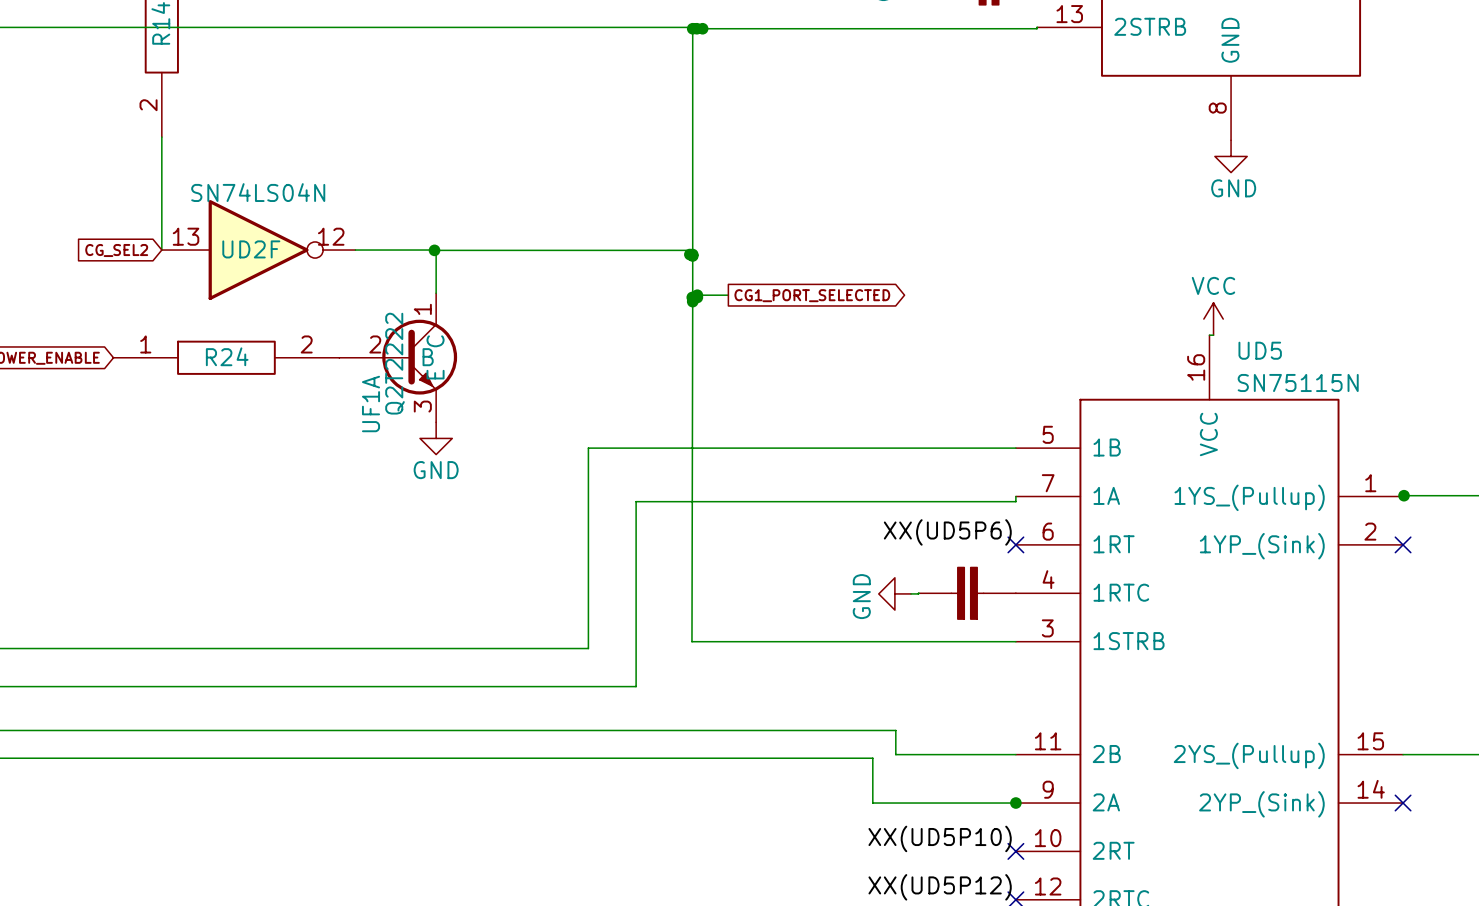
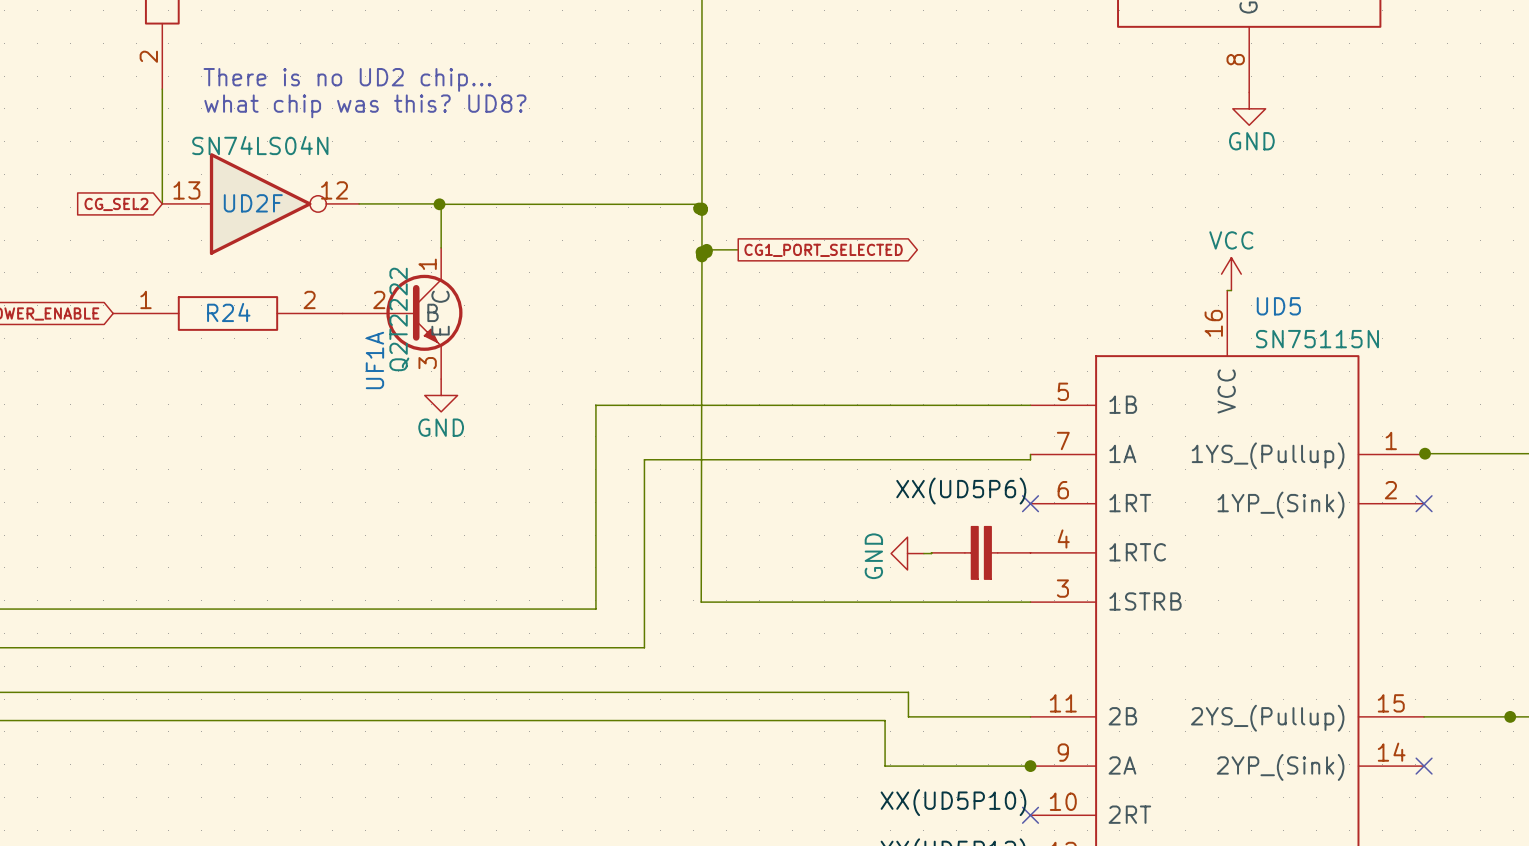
text: none -> There is no UD2 chip... (347, 79)
text: none -> what chip was this? UD8? (365, 106)

